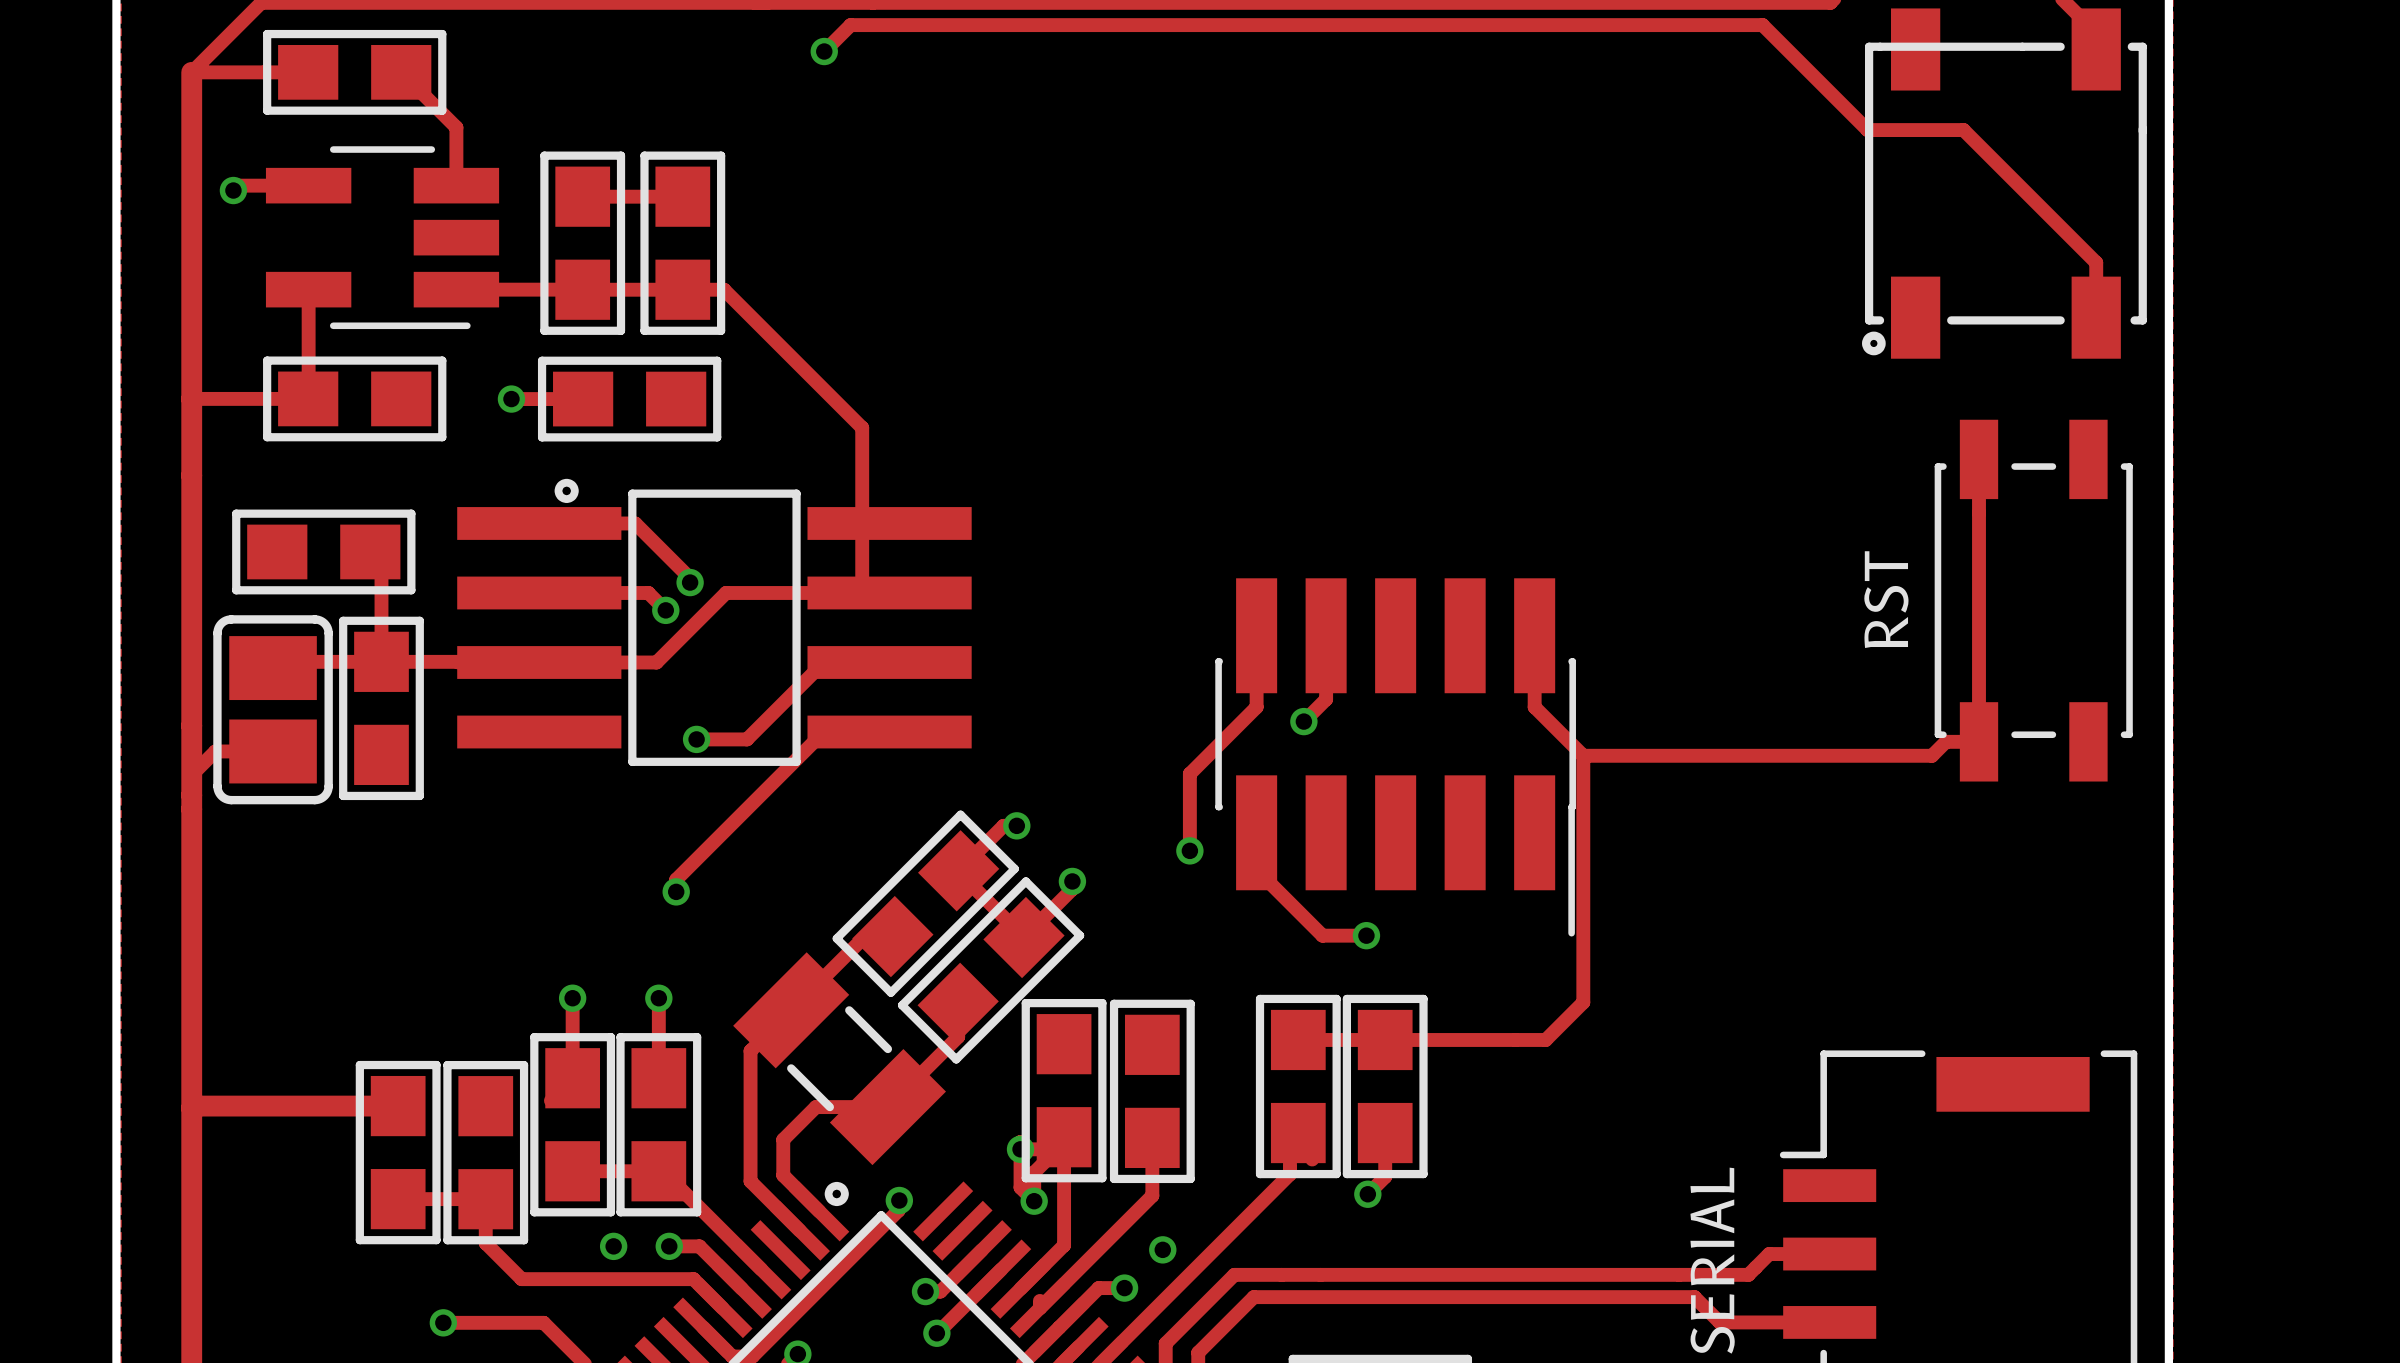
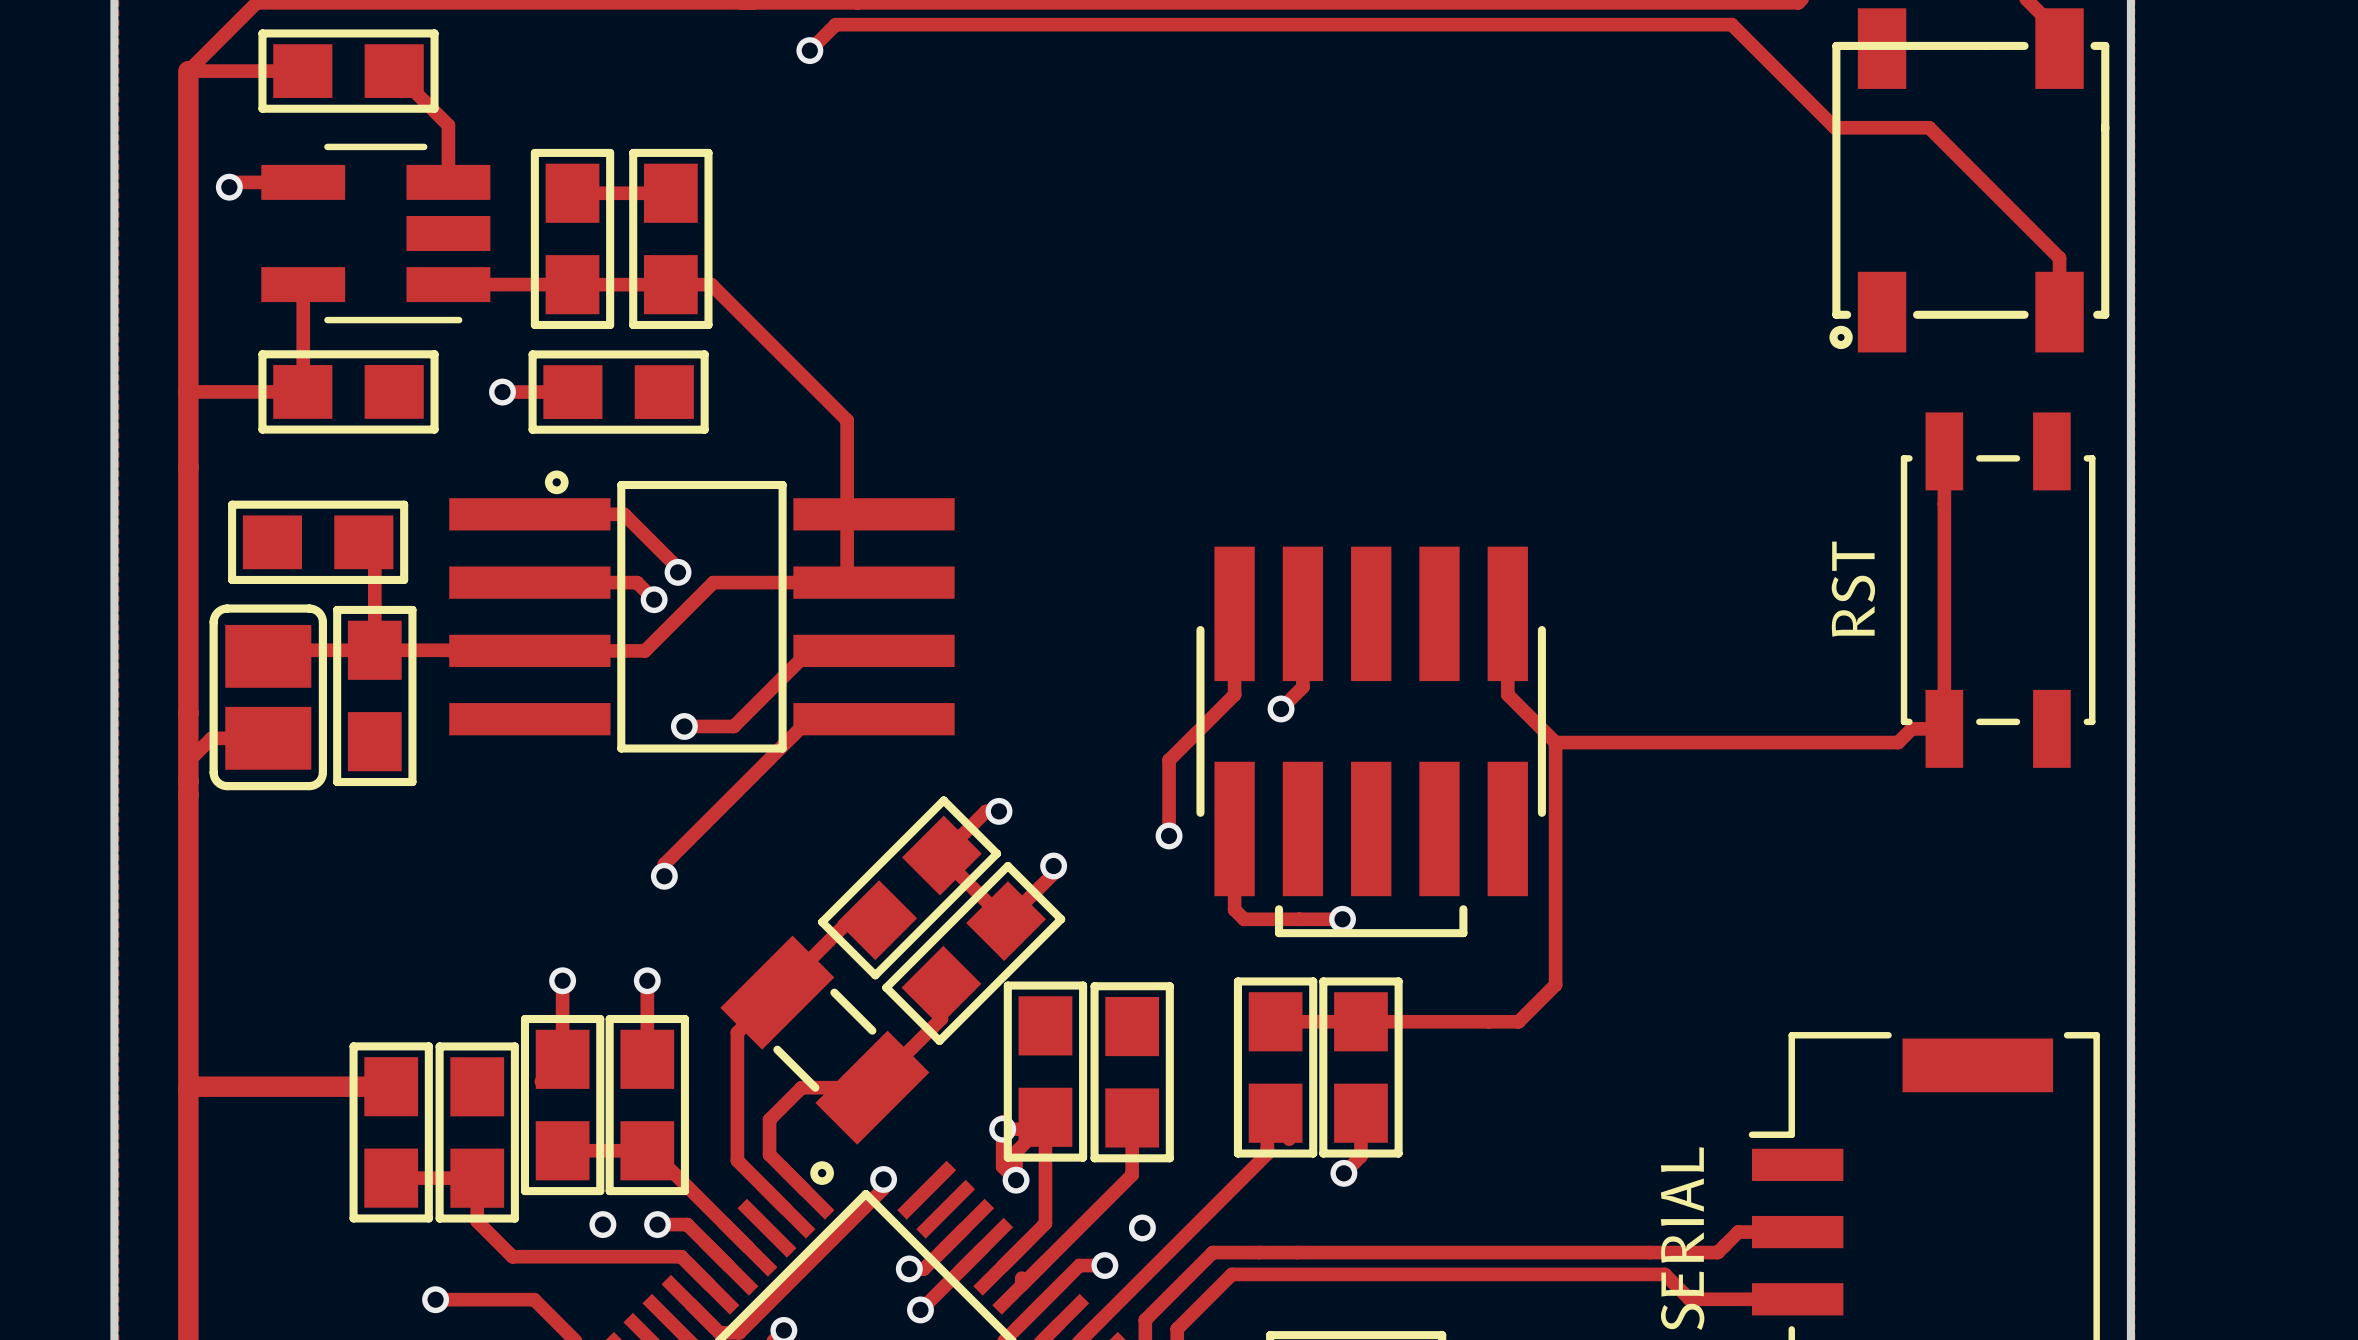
part footprint: [1215, 578, 1576, 937] -> [1196, 546, 1546, 938]
track: (1256, 869) (1322, 935) -> (1234, 854) (1234, 909) (1244, 919) (1299, 919)

